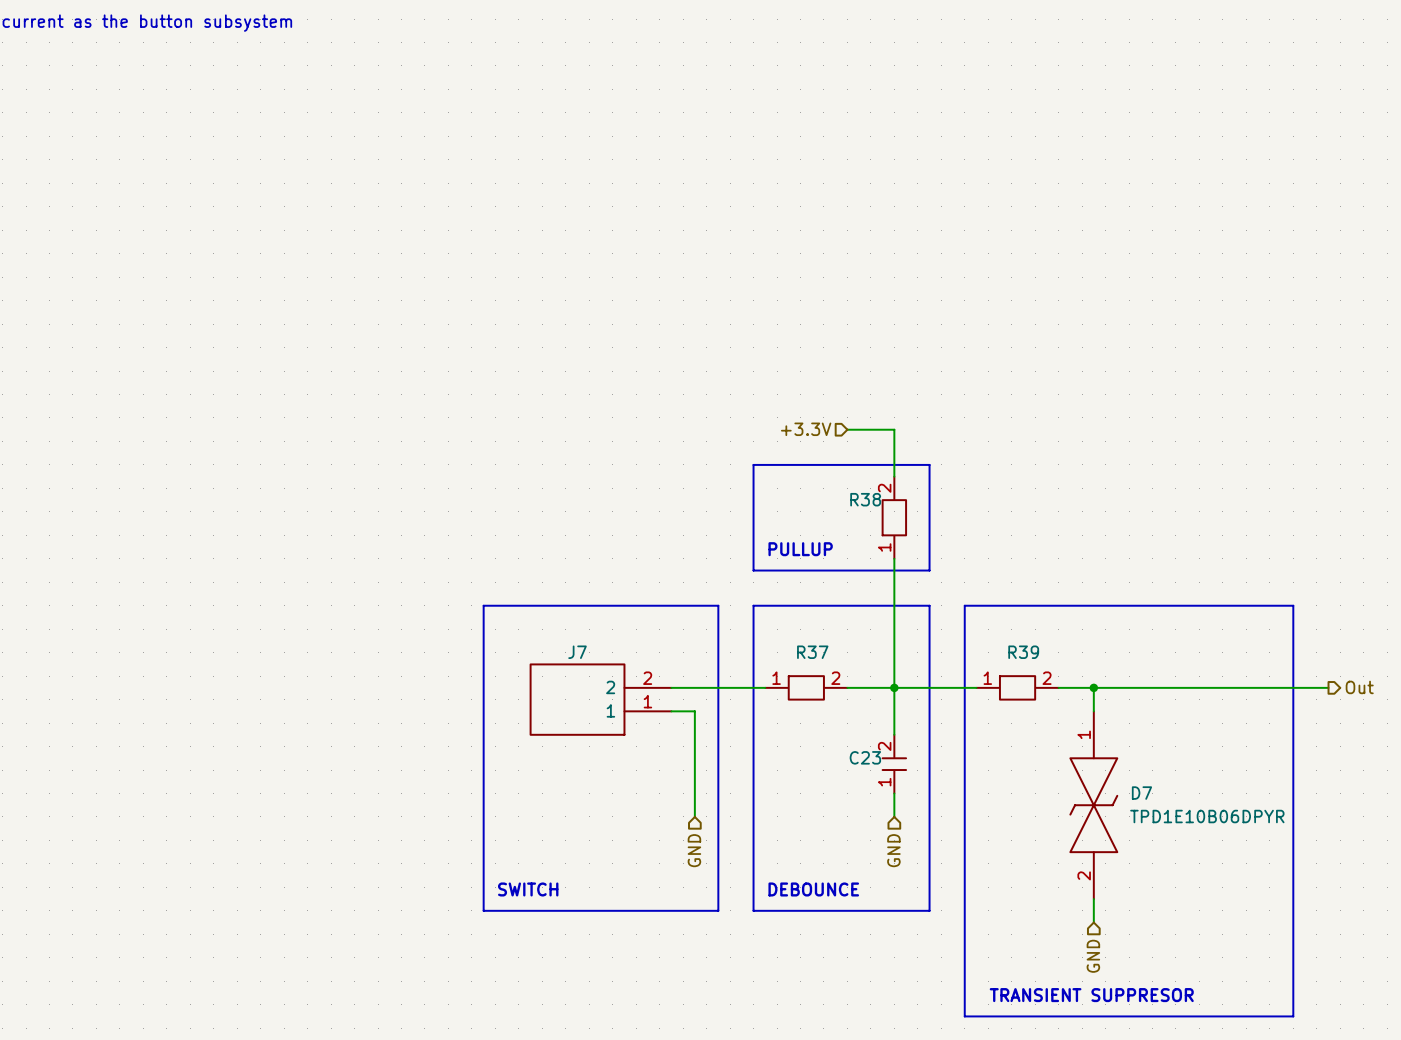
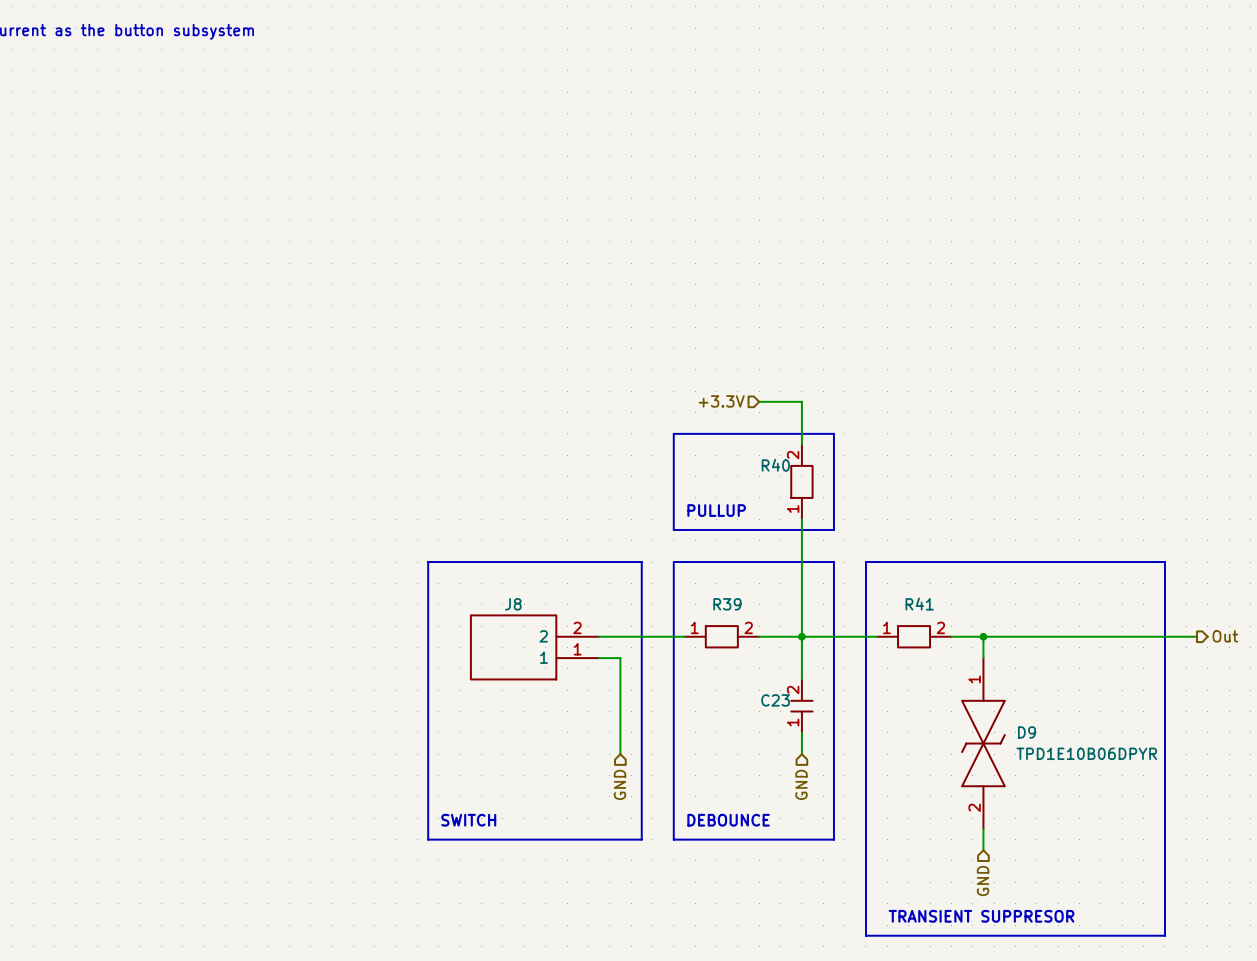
R38 name: R38 (865, 499) -> R40 (775, 465)
J7 name: J7 (577, 652) -> J8 (513, 604)
R37 name: R37 (812, 652) -> R39 (727, 604)
R39 name: R39 (1023, 652) -> R41 (919, 604)
D7 name: D7 (1141, 793) -> D9 (1027, 732)

